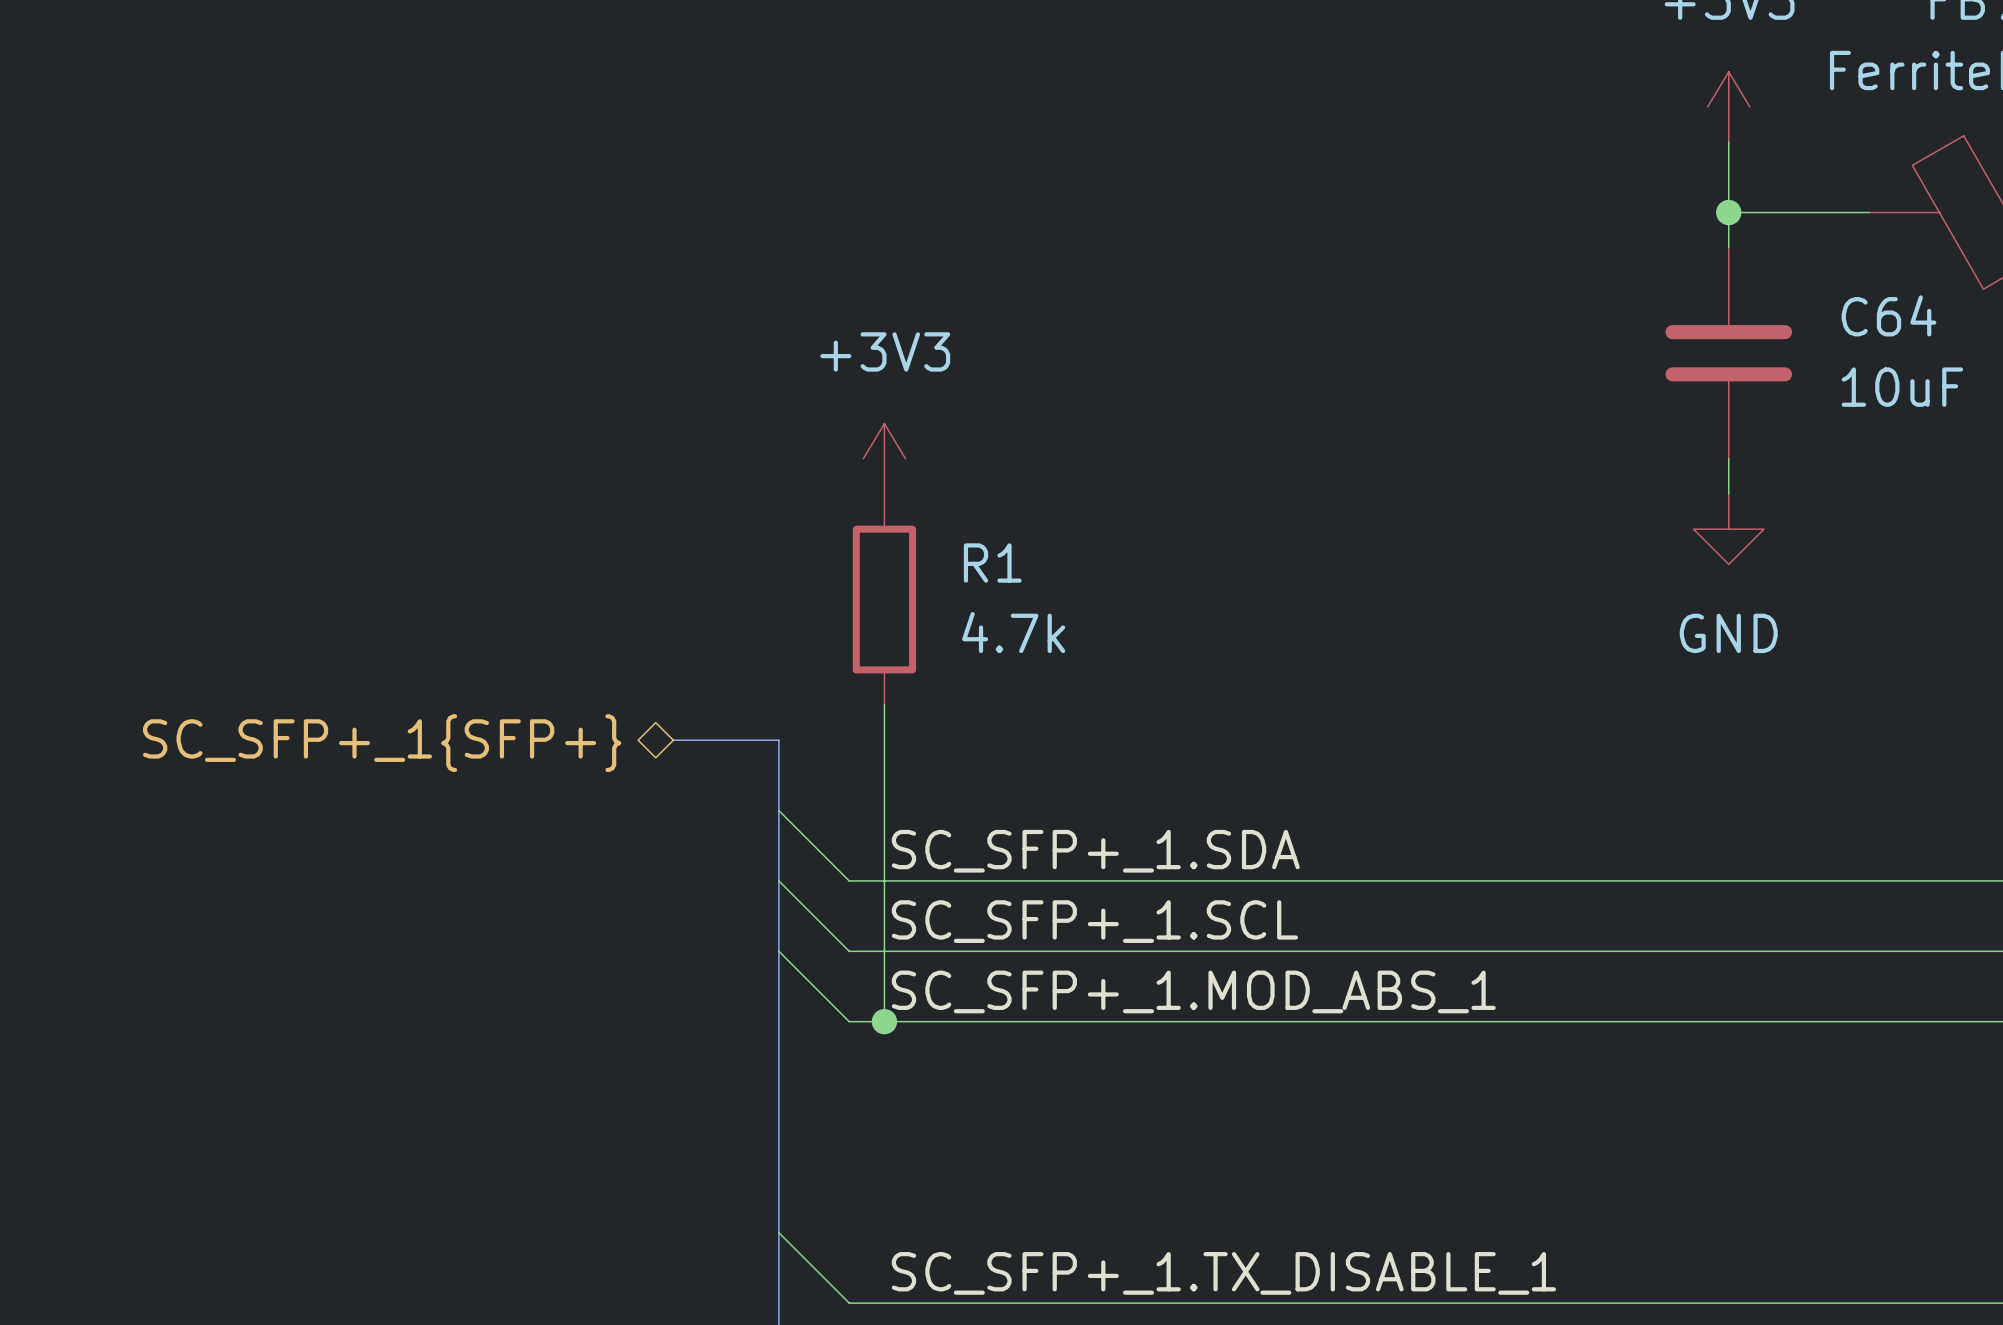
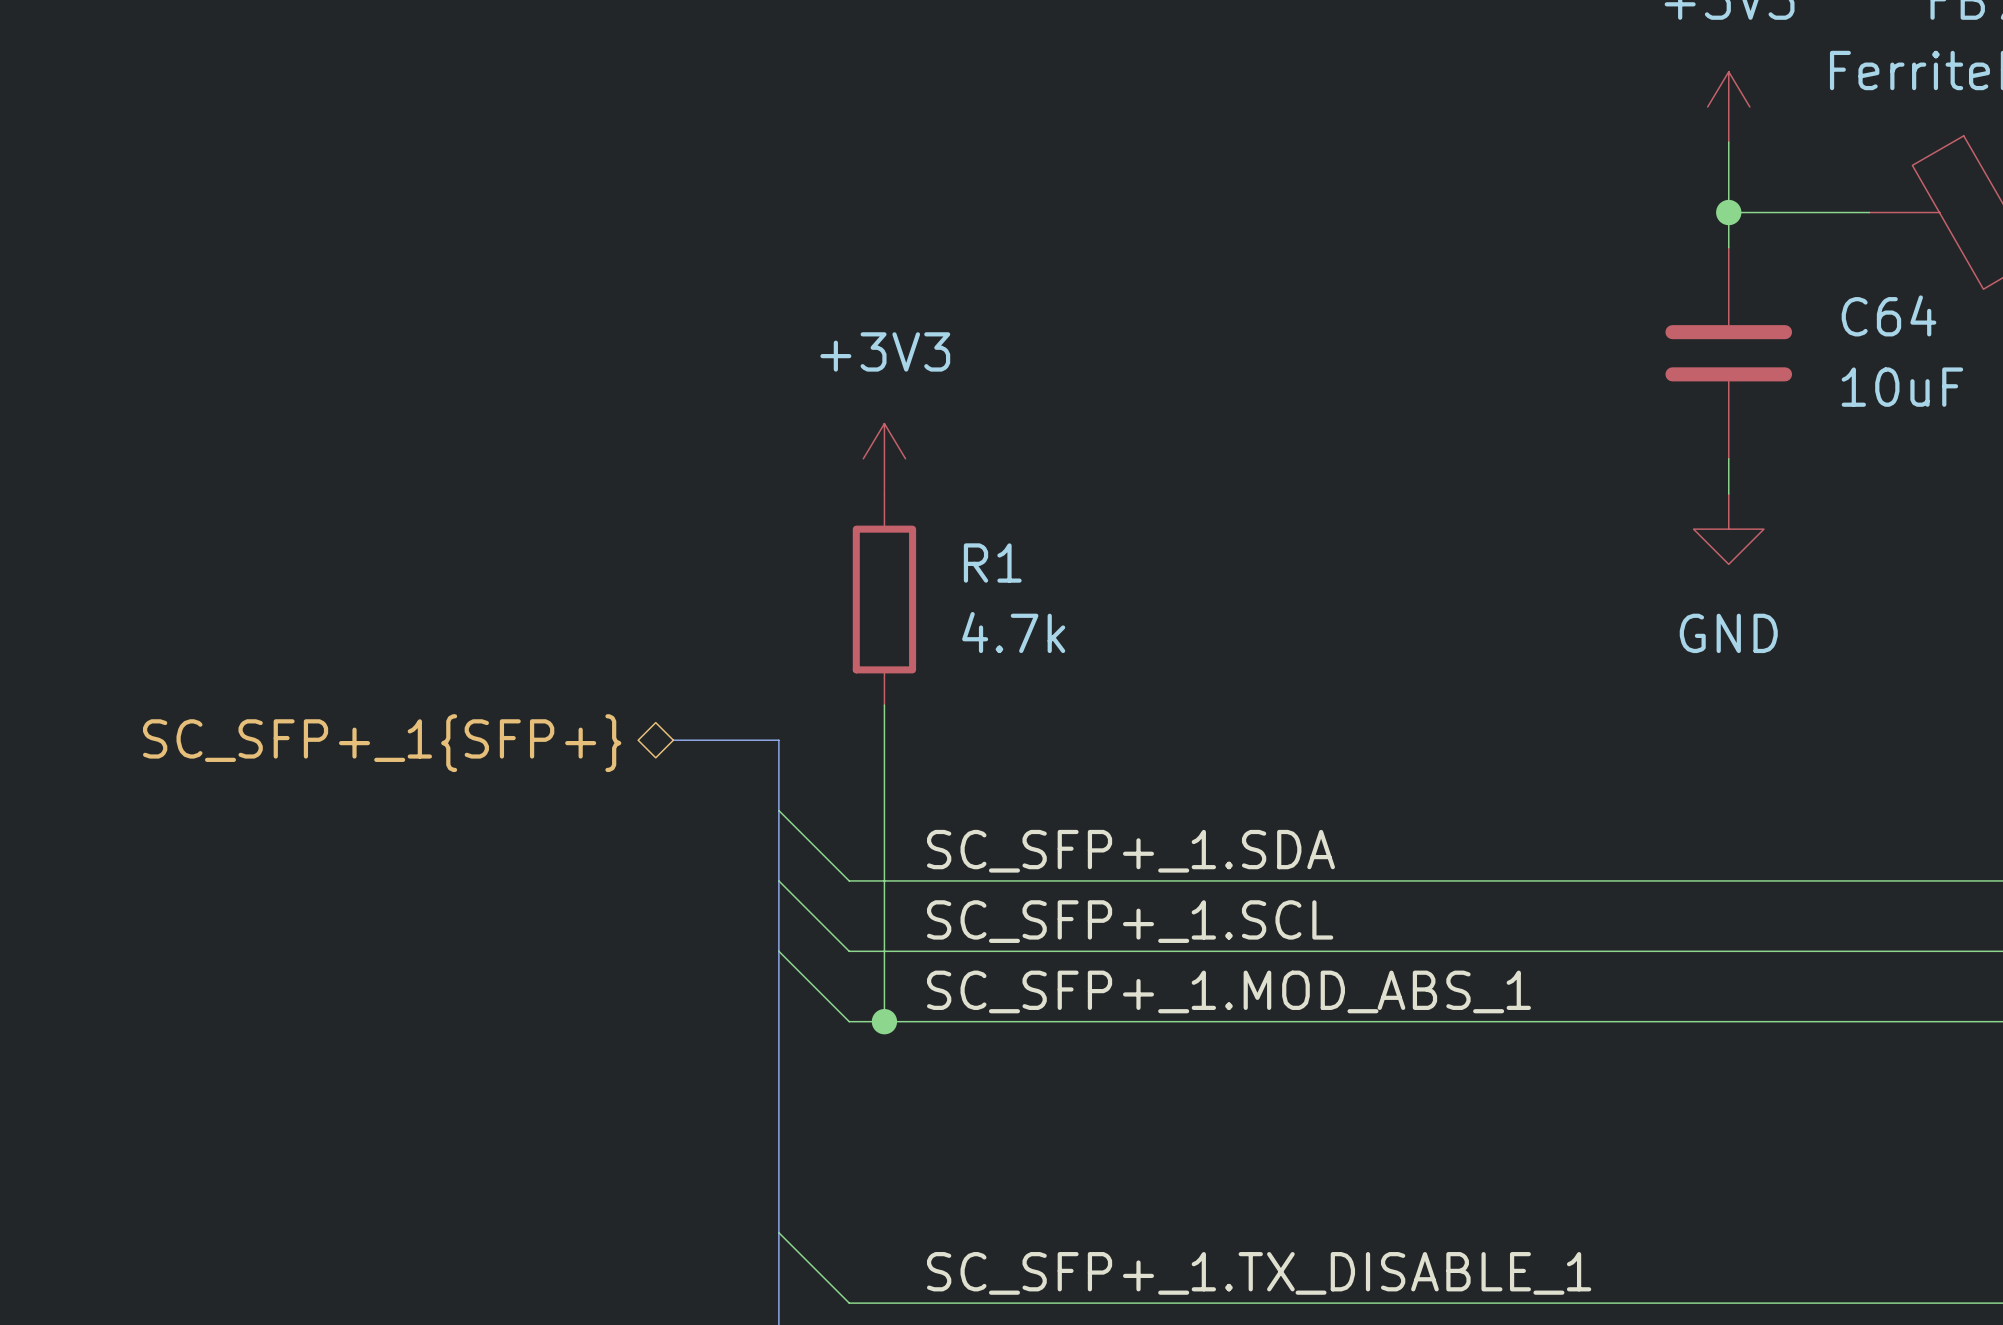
label position: SC_SFP+_1.SDA (1095, 851) -> SC_SFP+_1.SDA (1130, 851)
label position: SC_SFP+_1.SCL (1094, 921) -> SC_SFP+_1.SCL (1130, 921)
label position: SC_SFP+_1.MOD_ABS_1 (1193, 991) -> SC_SFP+_1.MOD_ABS_1 (1228, 991)
label position: SC_SFP+_1.TX_DISABLE_1 (1223, 1273) -> SC_SFP+_1.TX_DISABLE_1 (1259, 1273)

